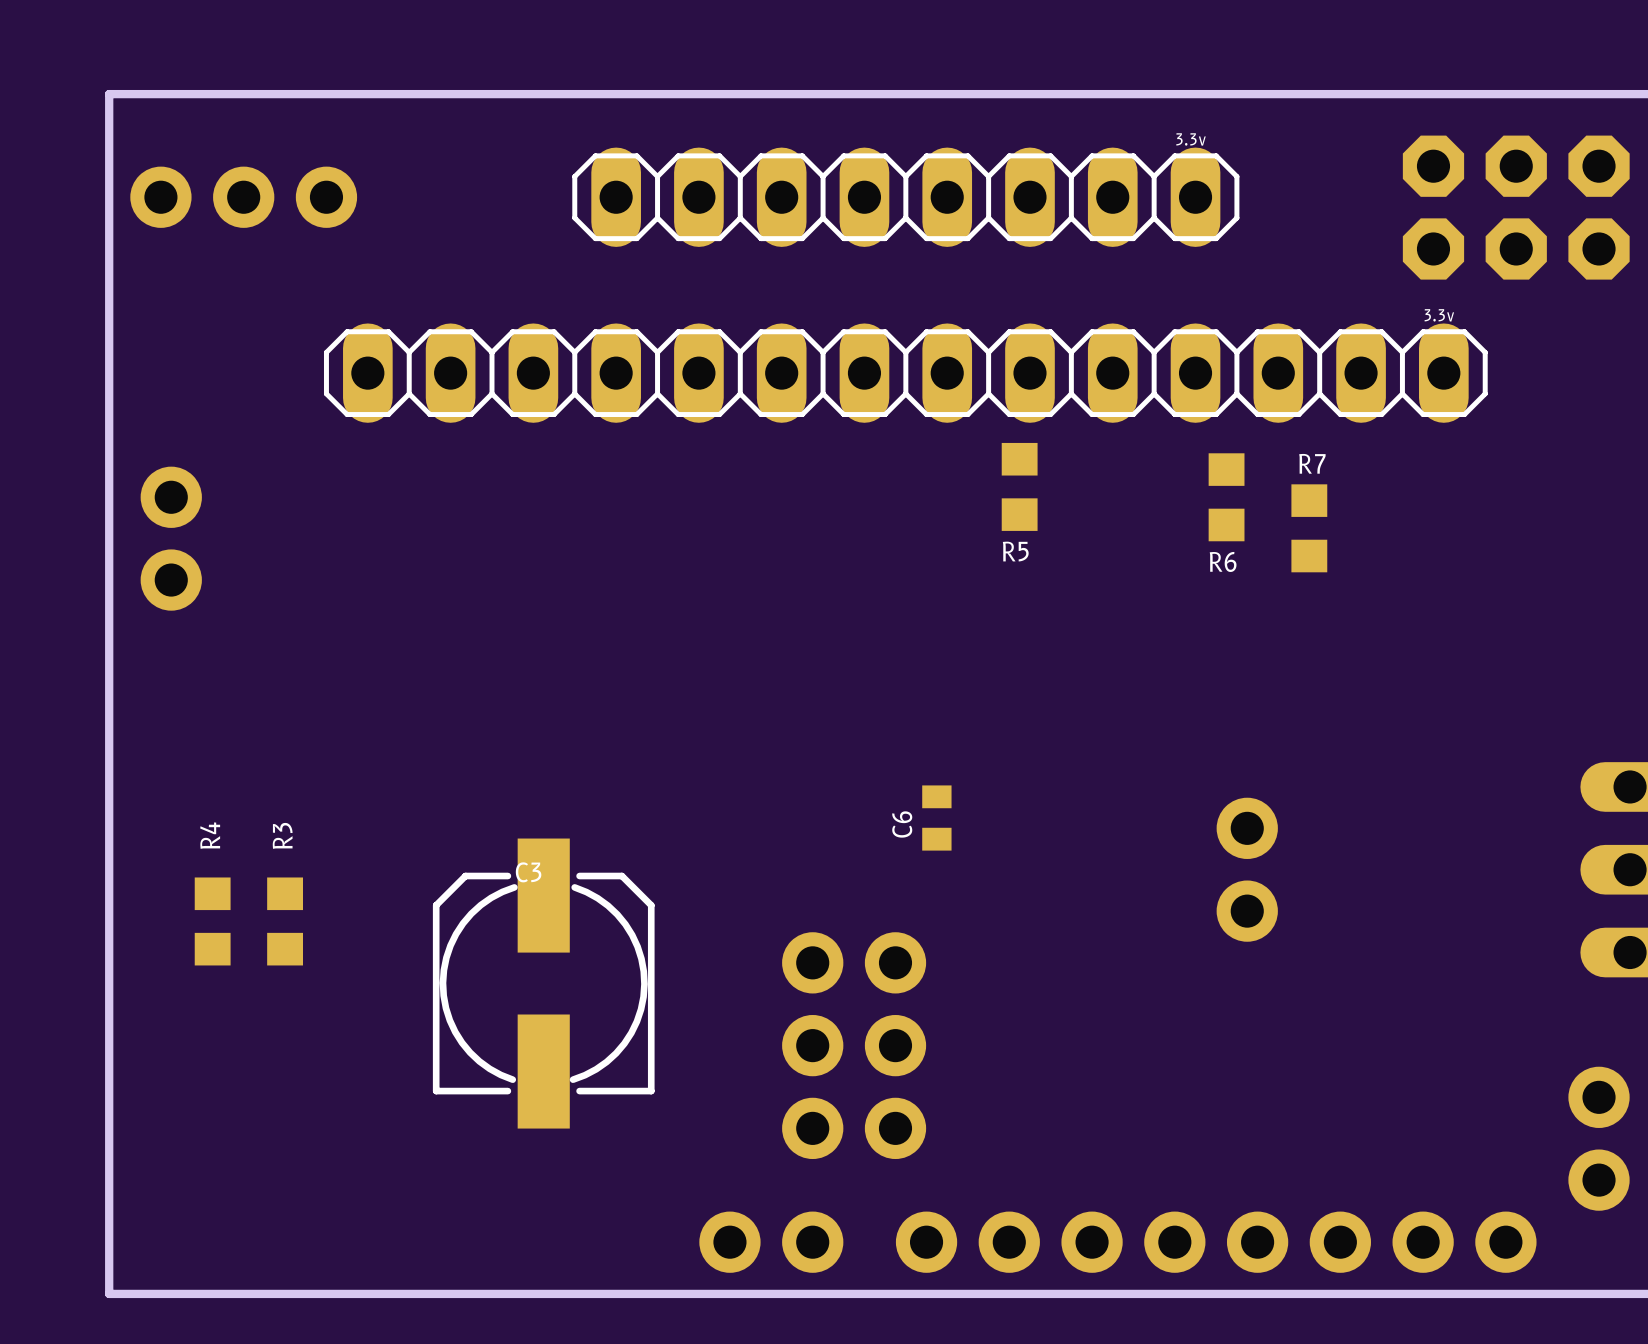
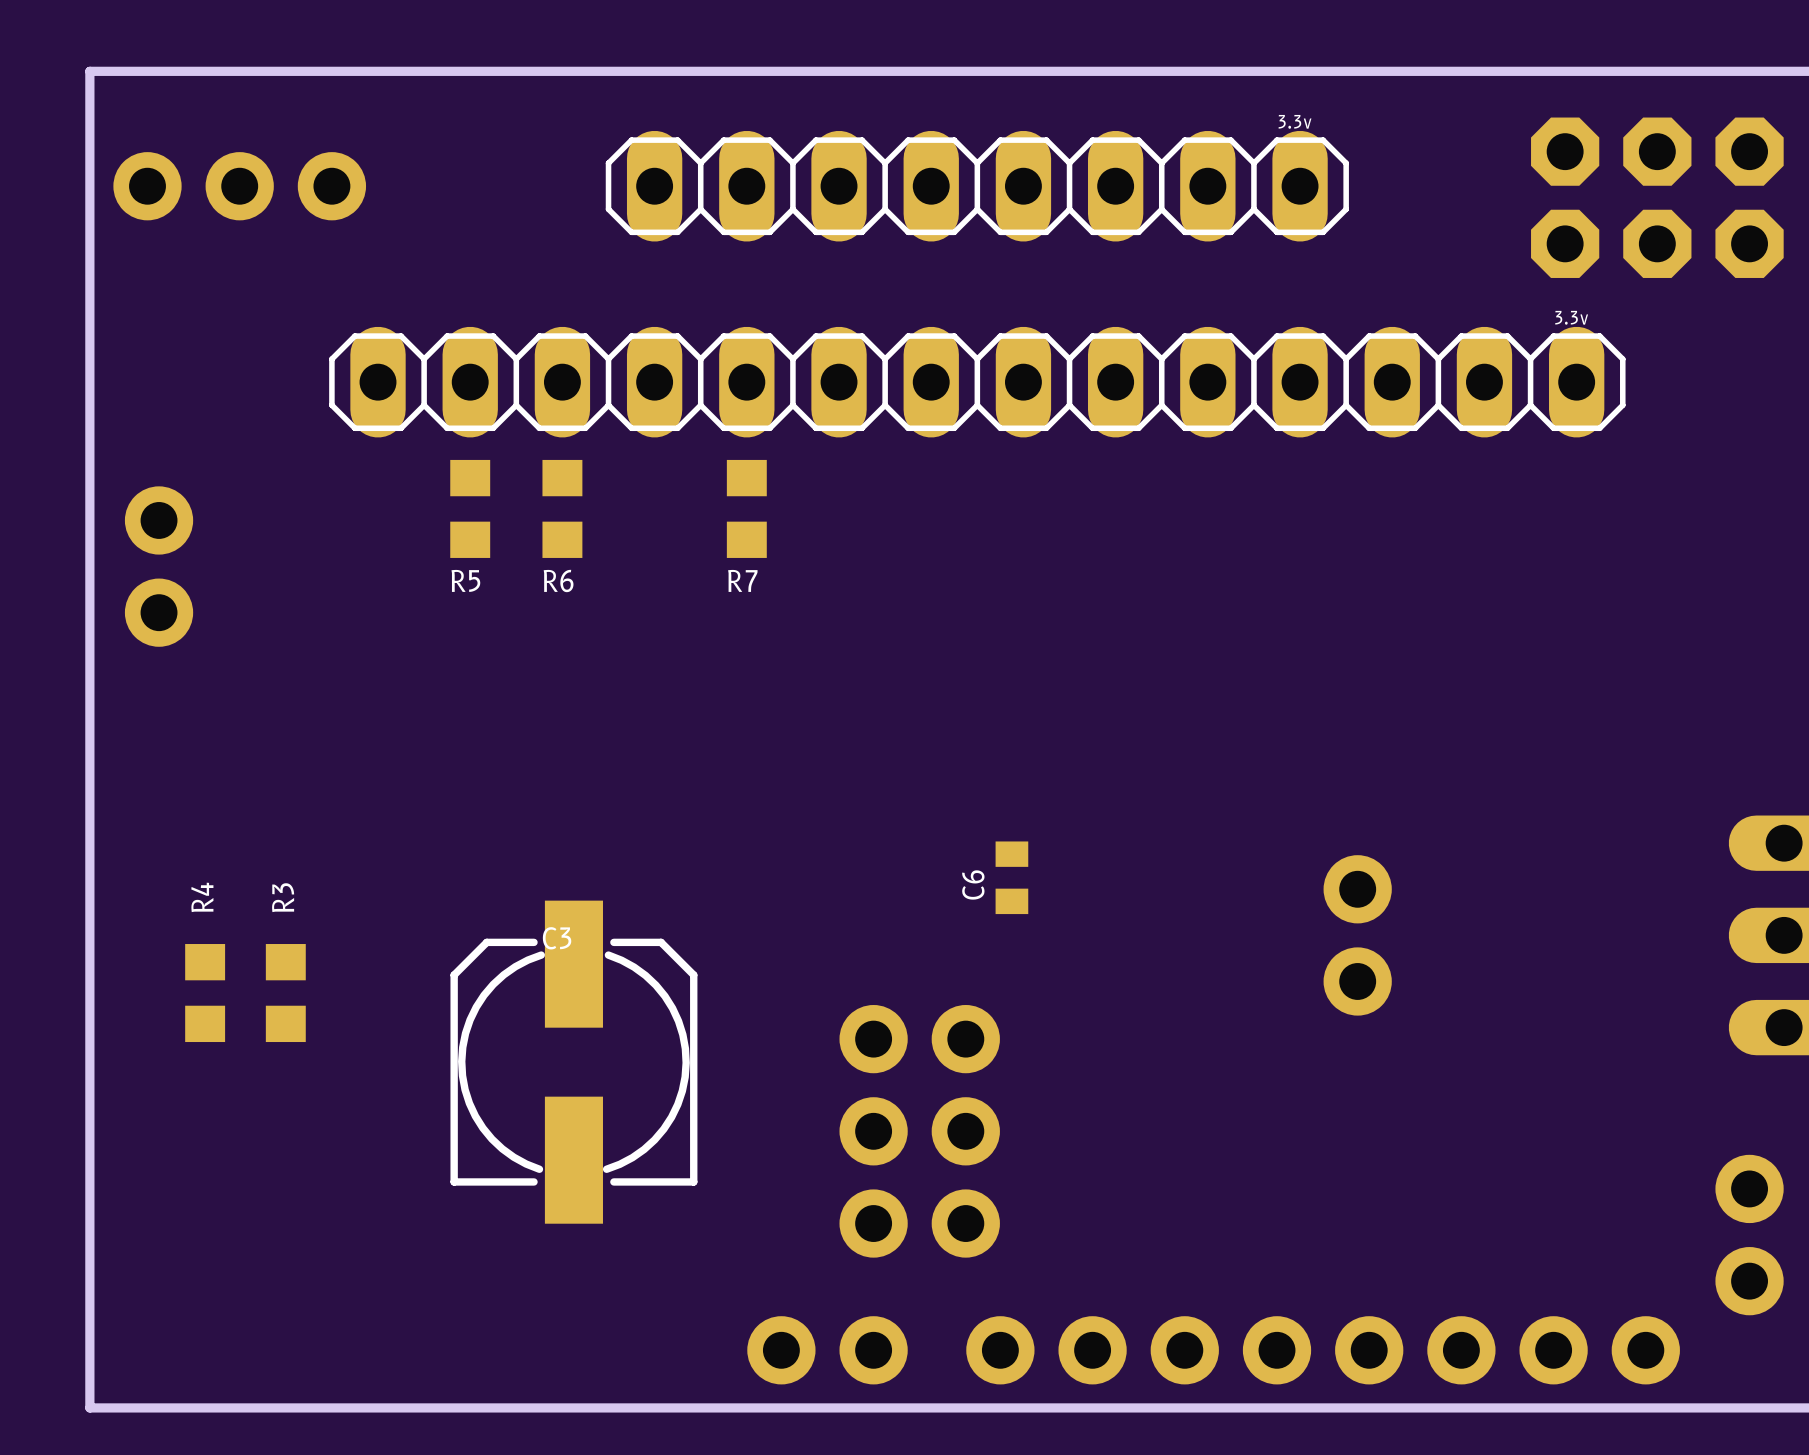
R7 name position: R7 (1312, 463) -> R7 (742, 580)
R5 position: (1019, 486) -> (470, 508)
R6 position: (1226, 497) -> (562, 508)
R7 position: (1309, 528) -> (746, 508)

